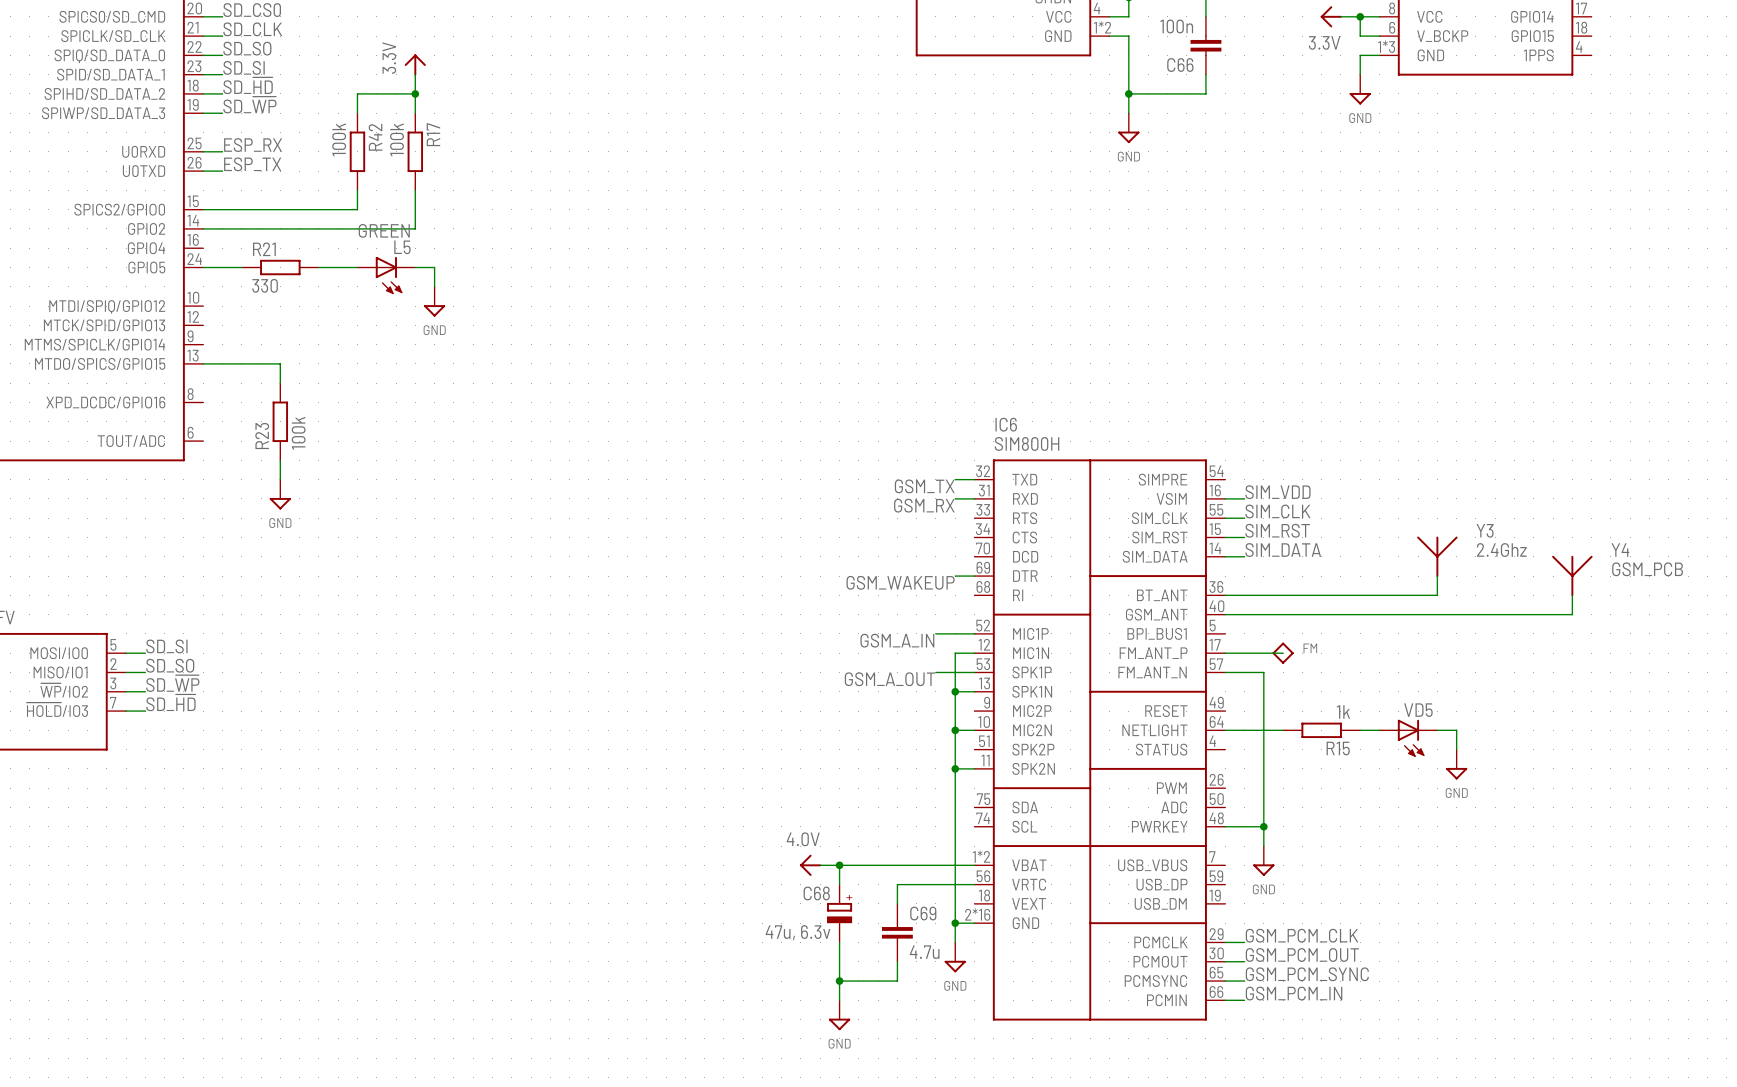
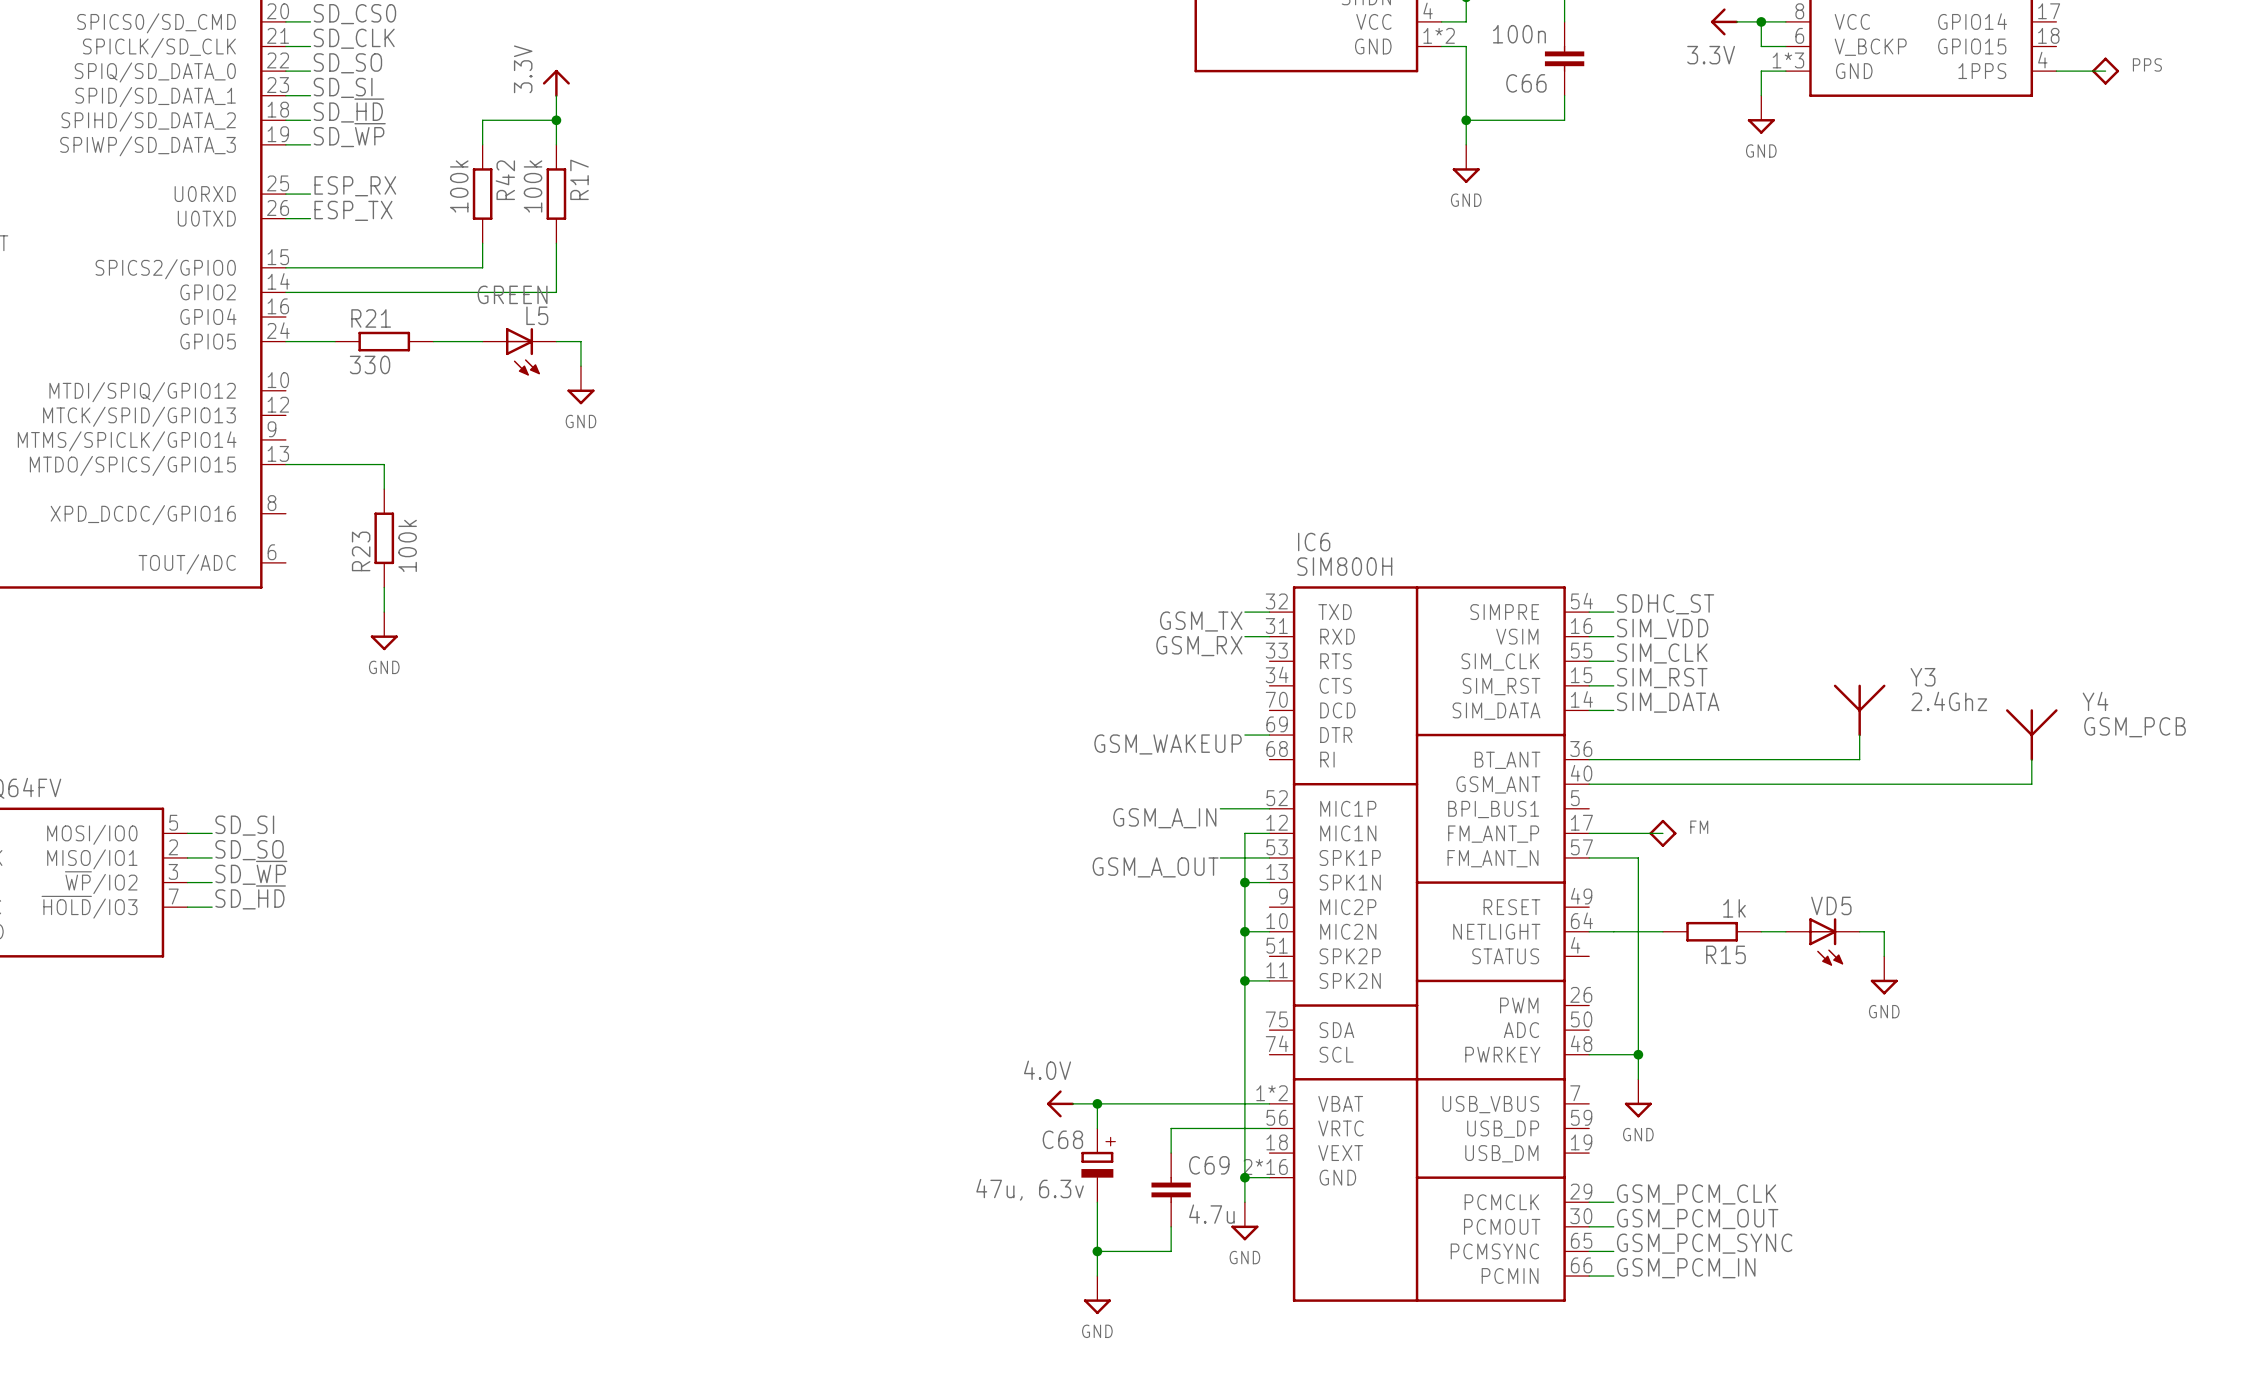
wire: none -> (2056, 71) (2105, 71)
part: none -> PPS (2105, 71)
label: none -> SDHC_ST (1665, 604)
wire: none -> (1589, 612) (1613, 612)

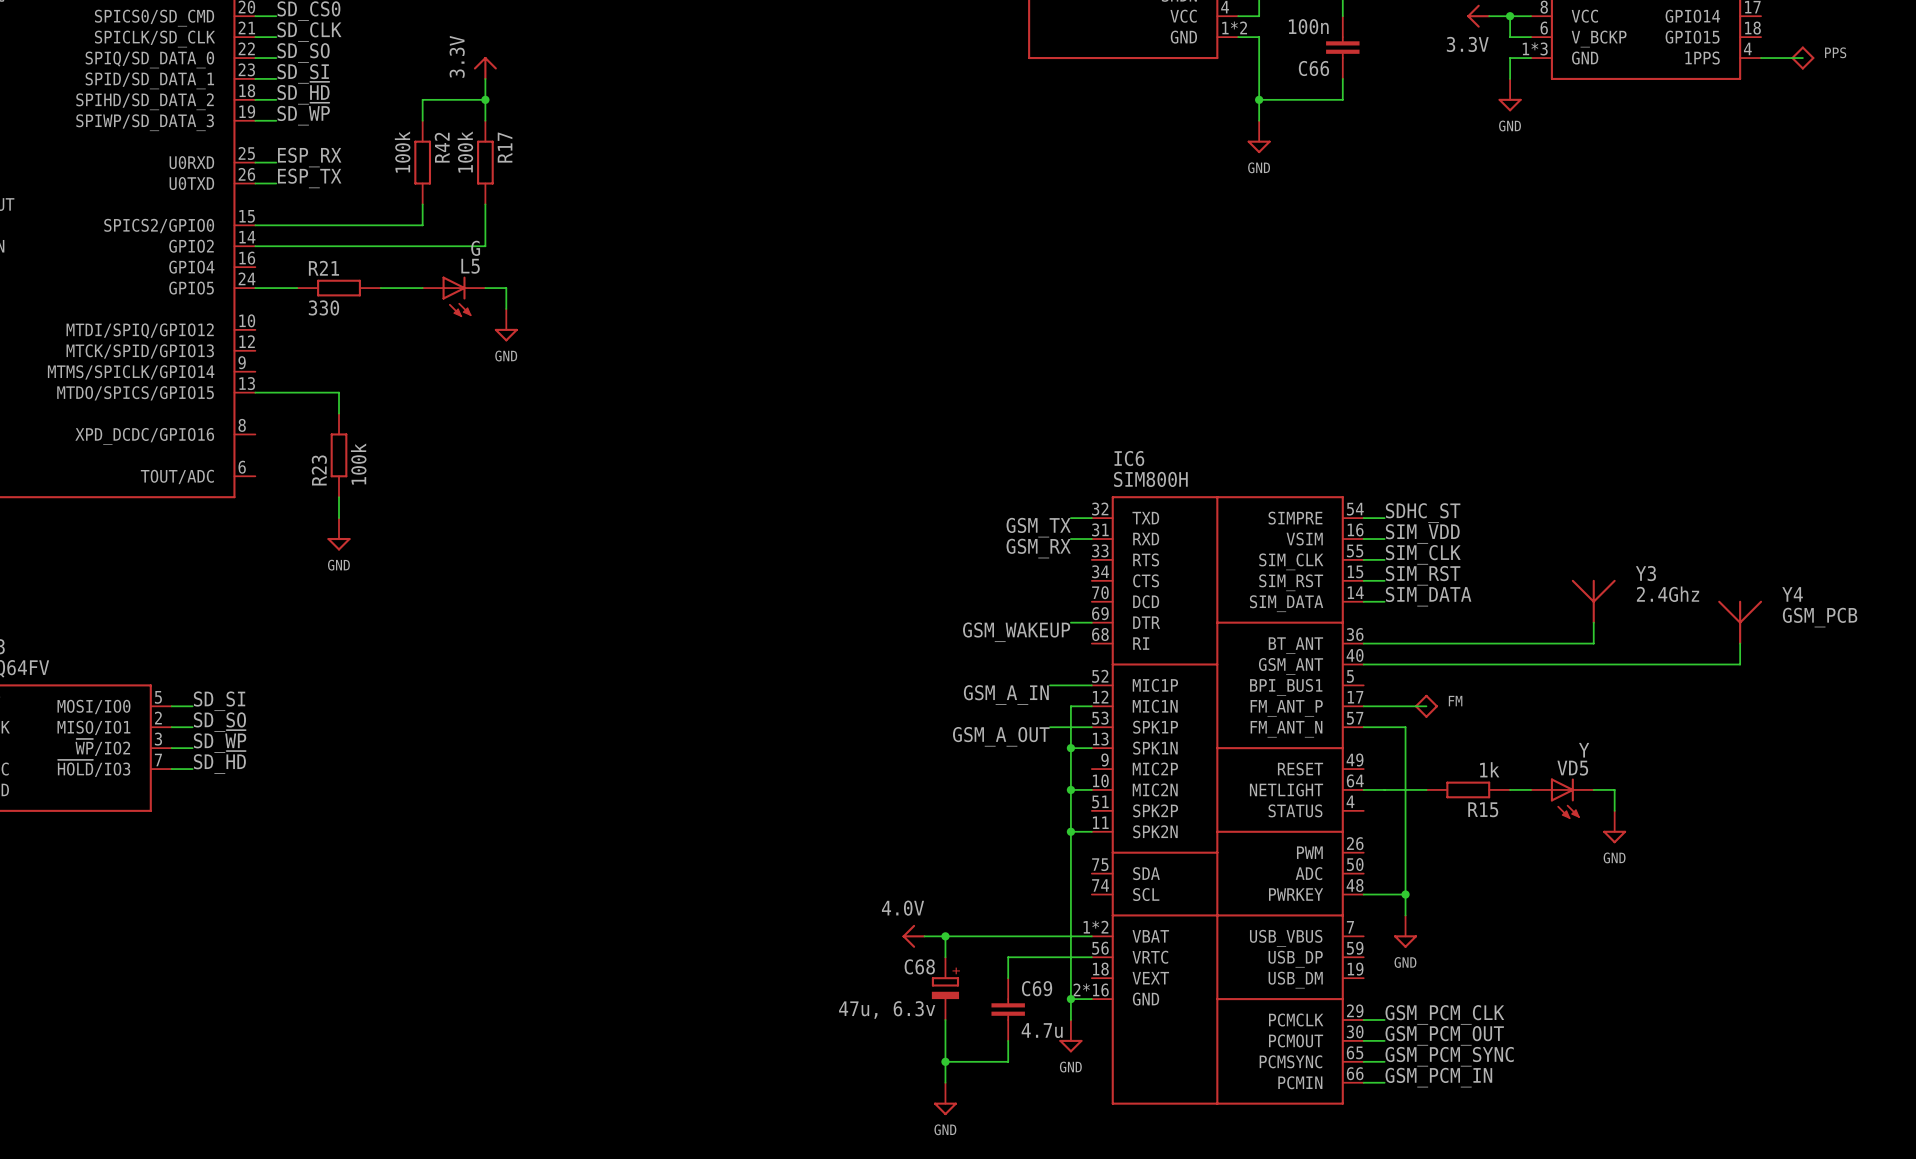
L5 value: GREEN (512, 294) -> G (475, 248)
VD5 value: none -> Y (1584, 750)

